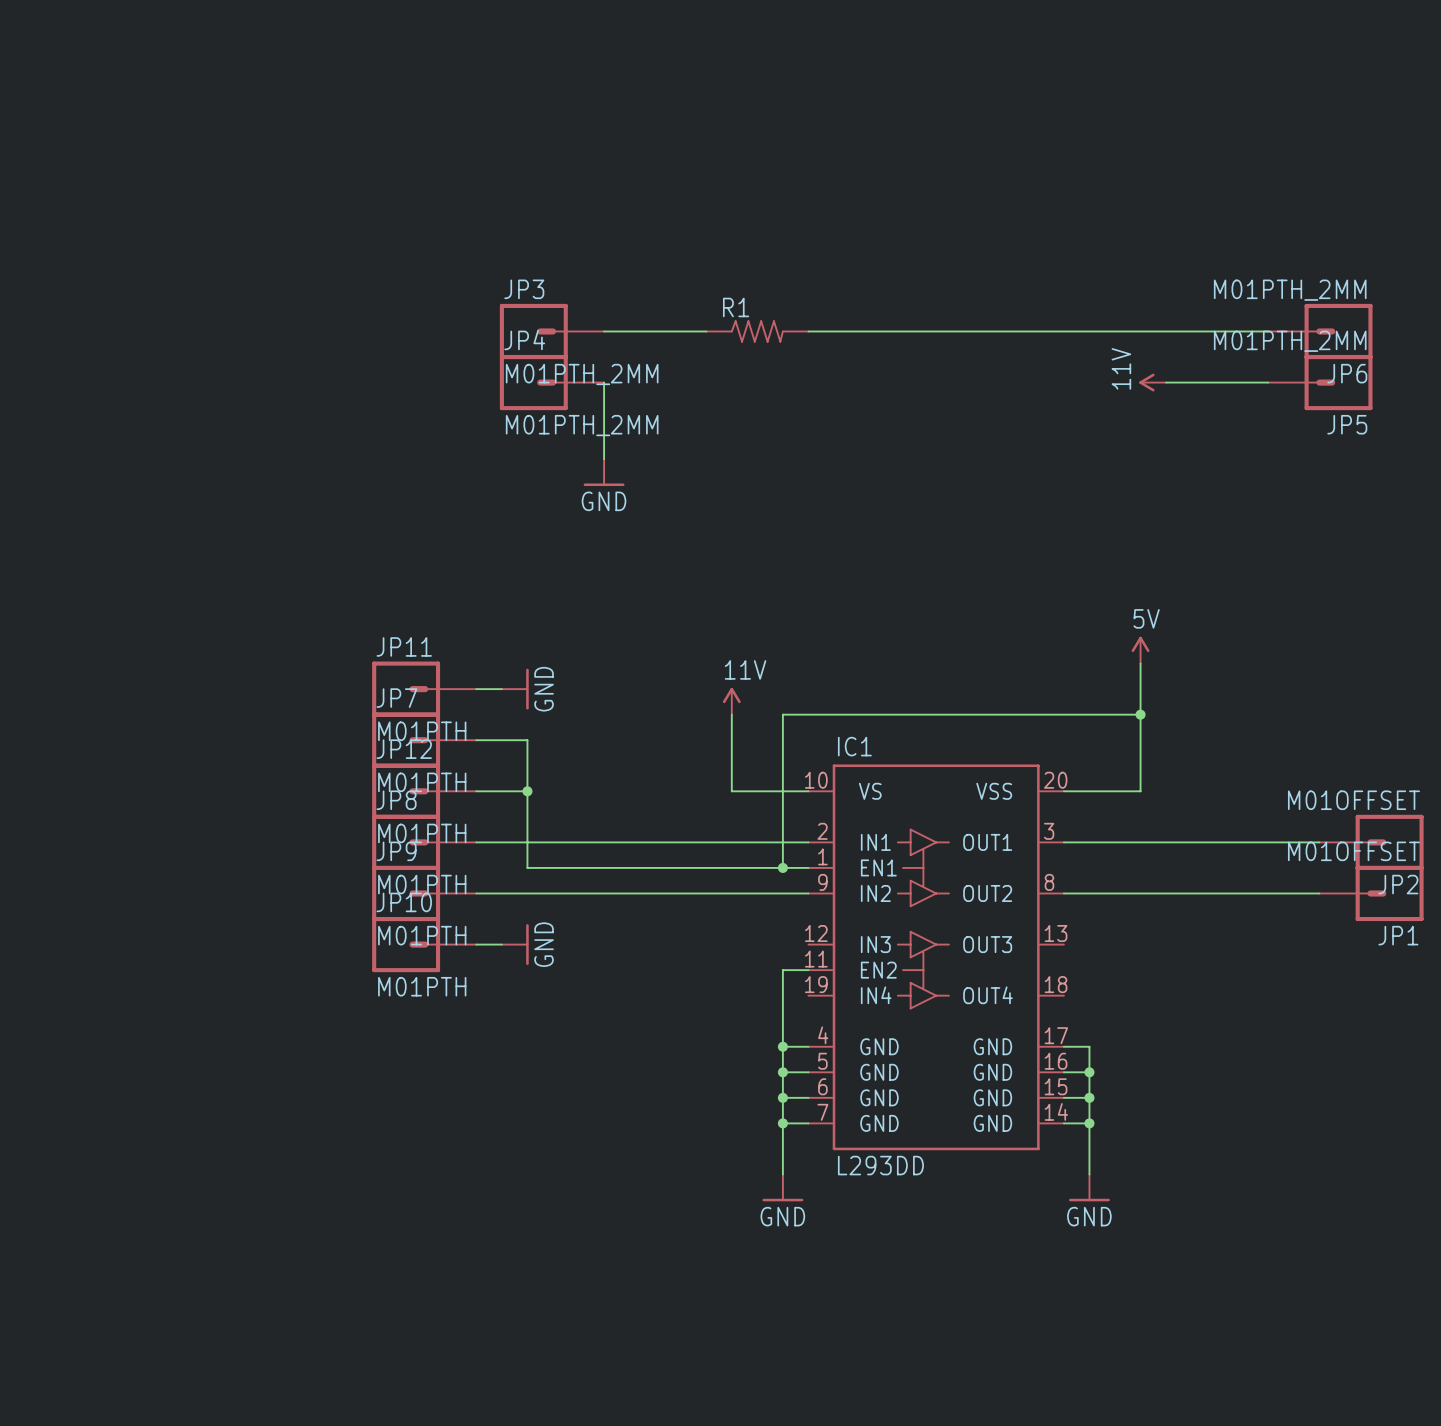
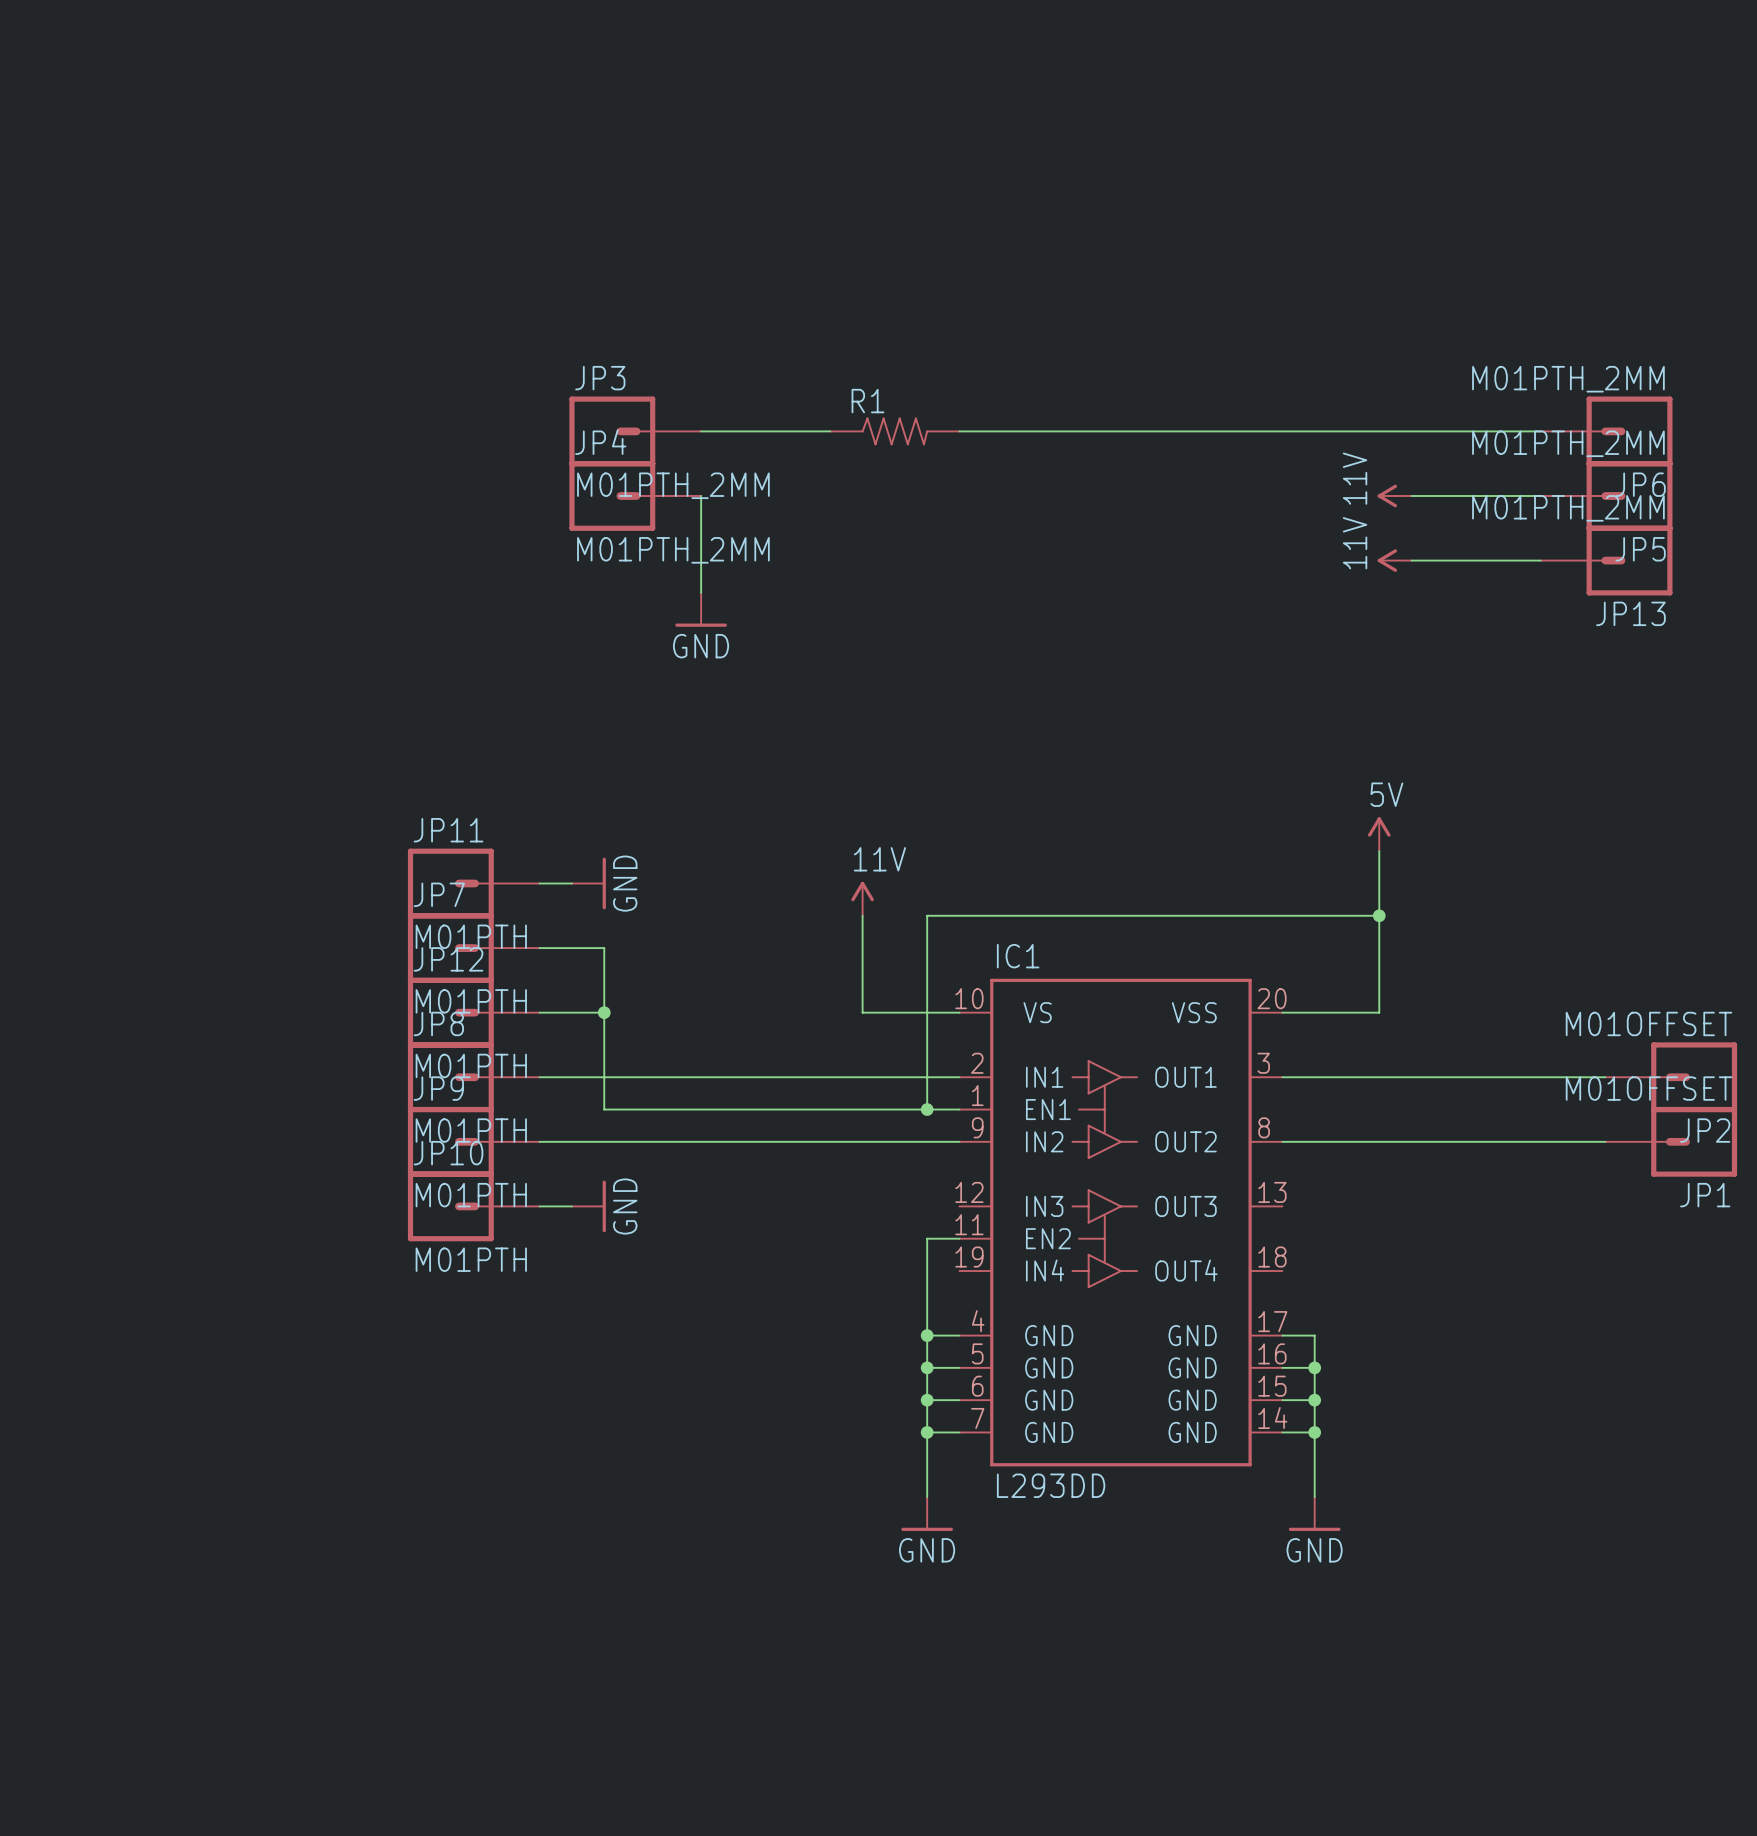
power symbol: none -> 11V (1394, 560)
wire: none -> (1411, 560) (1540, 560)
JP13: none -> M01PTH_2MM (1606, 560)

